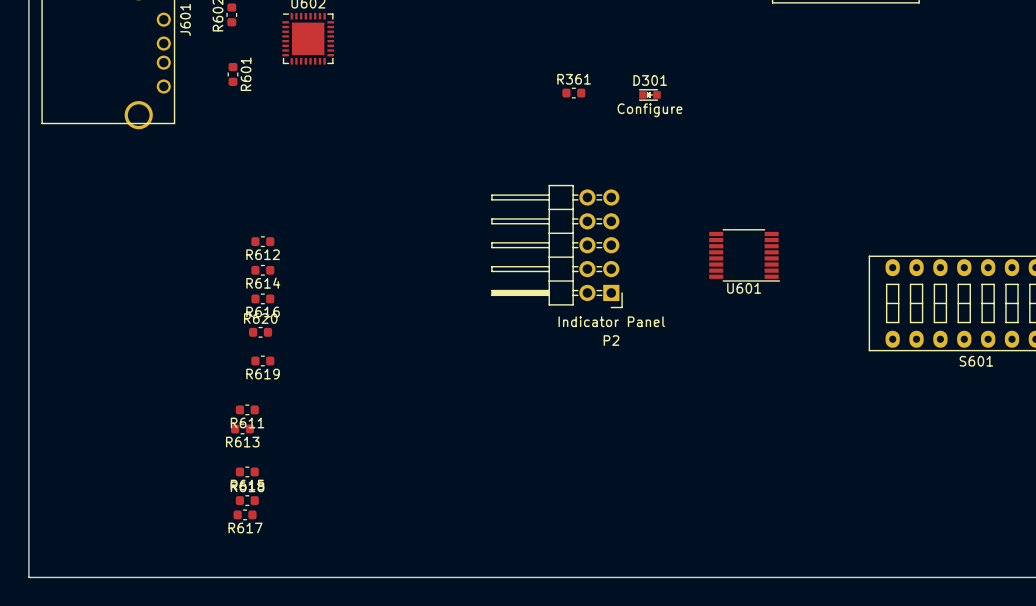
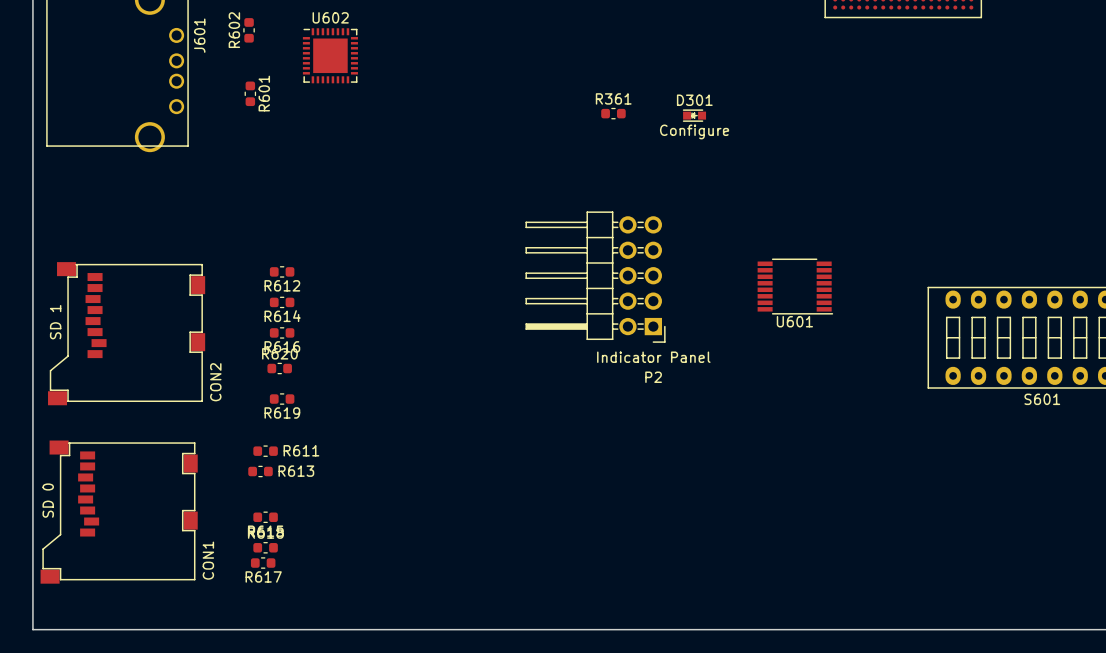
CON2: none -> SD 1 (126, 333)
R611 name position: R611 (247, 422) -> R611 (301, 450)
R613 name position: R613 (242, 442) -> R613 (296, 471)
CON1: none -> SD 0 (119, 512)

